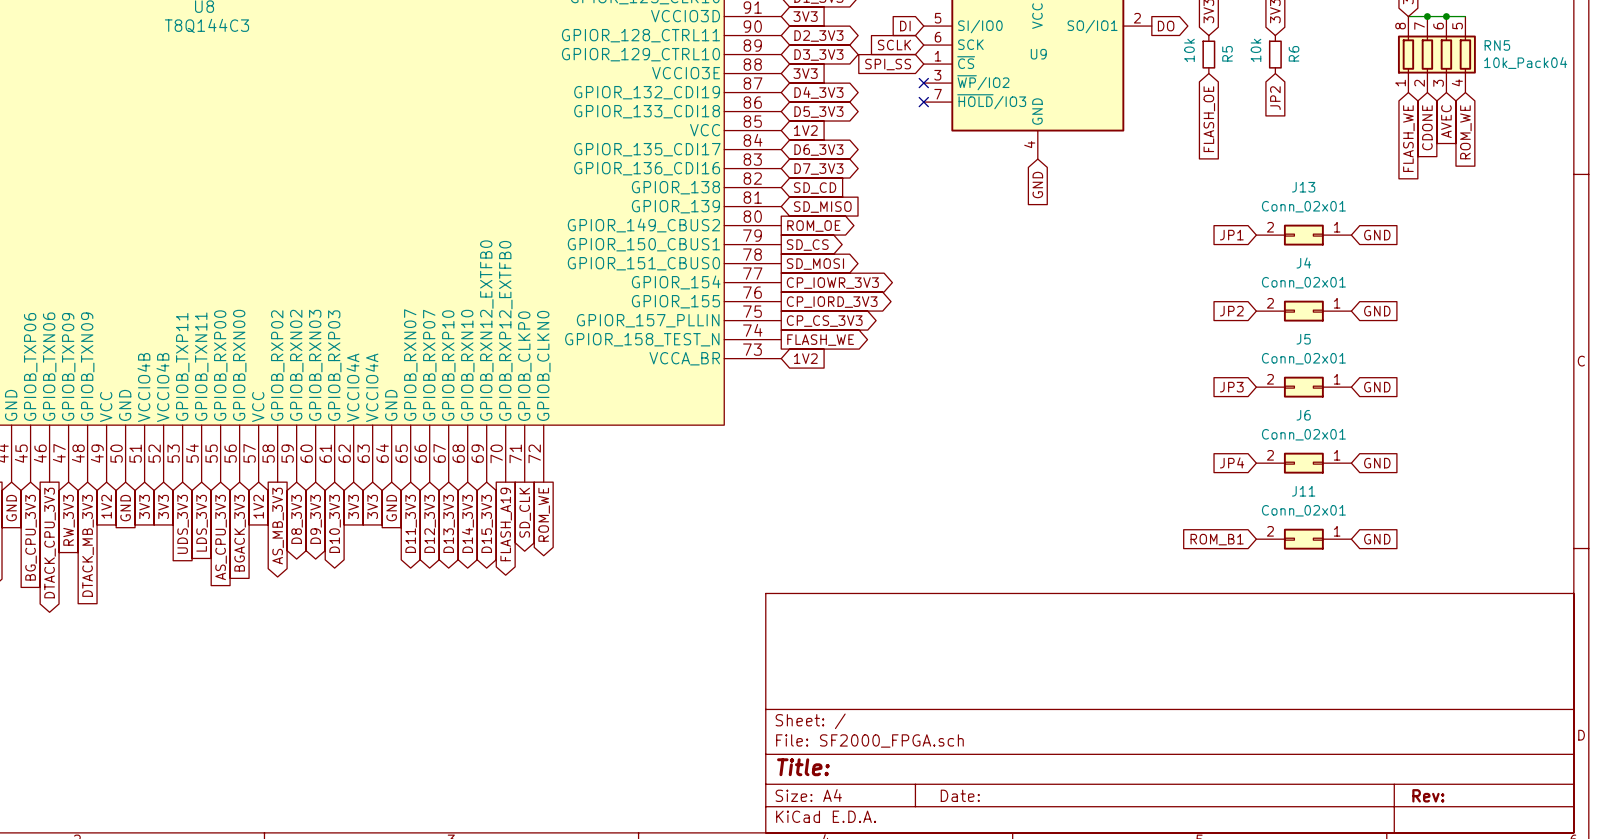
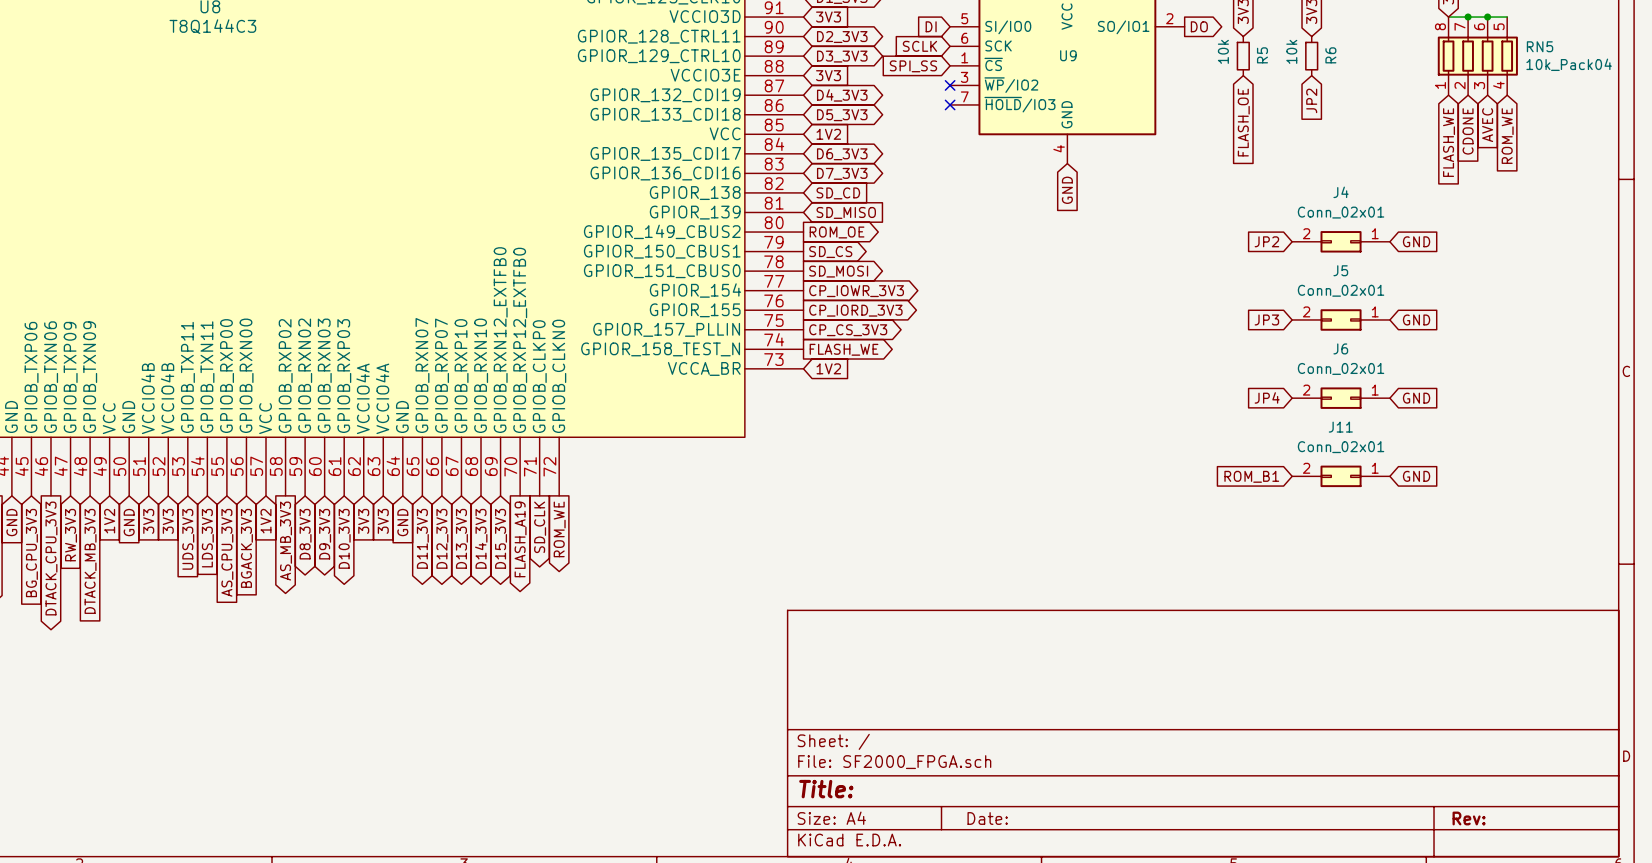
J13 name: J13 (1303, 187) -> J4 (1341, 192)
global label: JP1 (1231, 235) -> JP2 (1266, 241)
J4 name: J4 (1303, 263) -> J5 (1340, 270)
global label: JP2 (1231, 311) -> JP3 (1266, 319)
J5 name: J5 (1303, 339) -> J6 (1340, 348)
global label: JP3 (1231, 387) -> JP4 (1267, 397)
J6 name: J6 (1303, 415) -> J11 (1340, 427)
global label: JP4 (1232, 462) -> ROM_B1 (1251, 476)
global label: ROM_B1 (1217, 539) -> none
J11: Conn_02x01 (1303, 539) -> none
global label: GND (1377, 539) -> none

